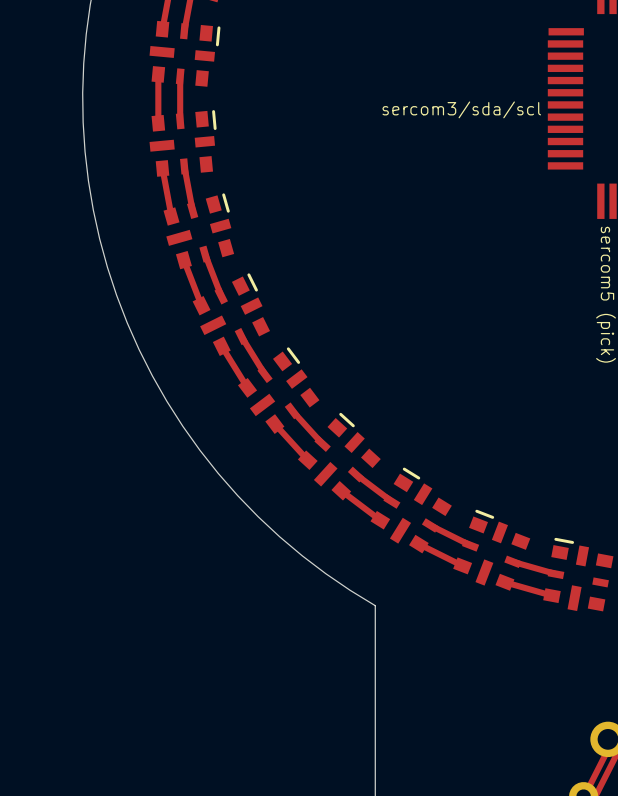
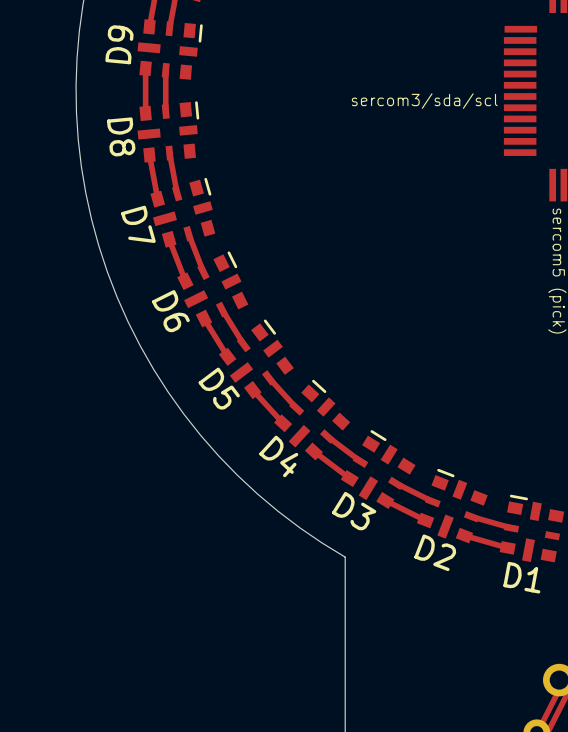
D9 name: none -> D9 (119, 44)
D8 name: none -> D8 (121, 136)
D7 name: none -> D7 (138, 224)
D6 name: none -> D6 (170, 311)
D5 name: none -> D5 (219, 388)
D4 name: none -> D4 (278, 456)
D3 name: none -> D3 (354, 511)
D2 name: none -> D2 (435, 552)
D1 name: none -> D1 (521, 577)

